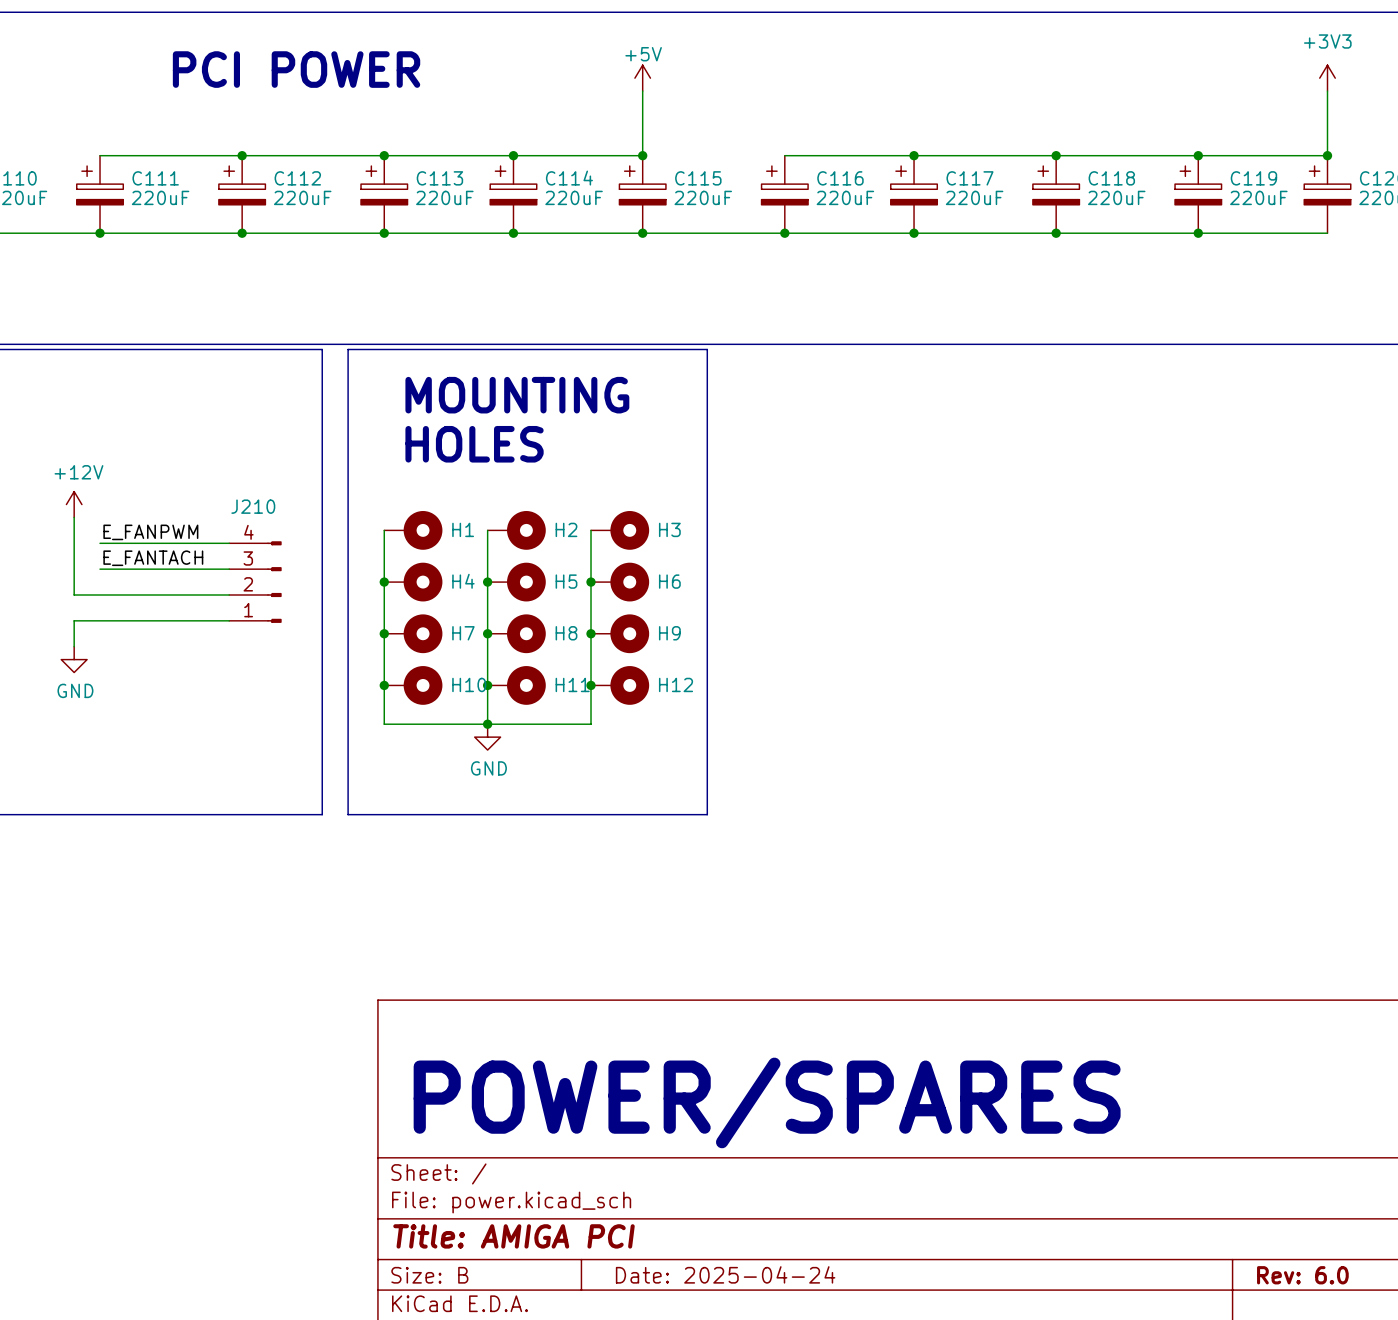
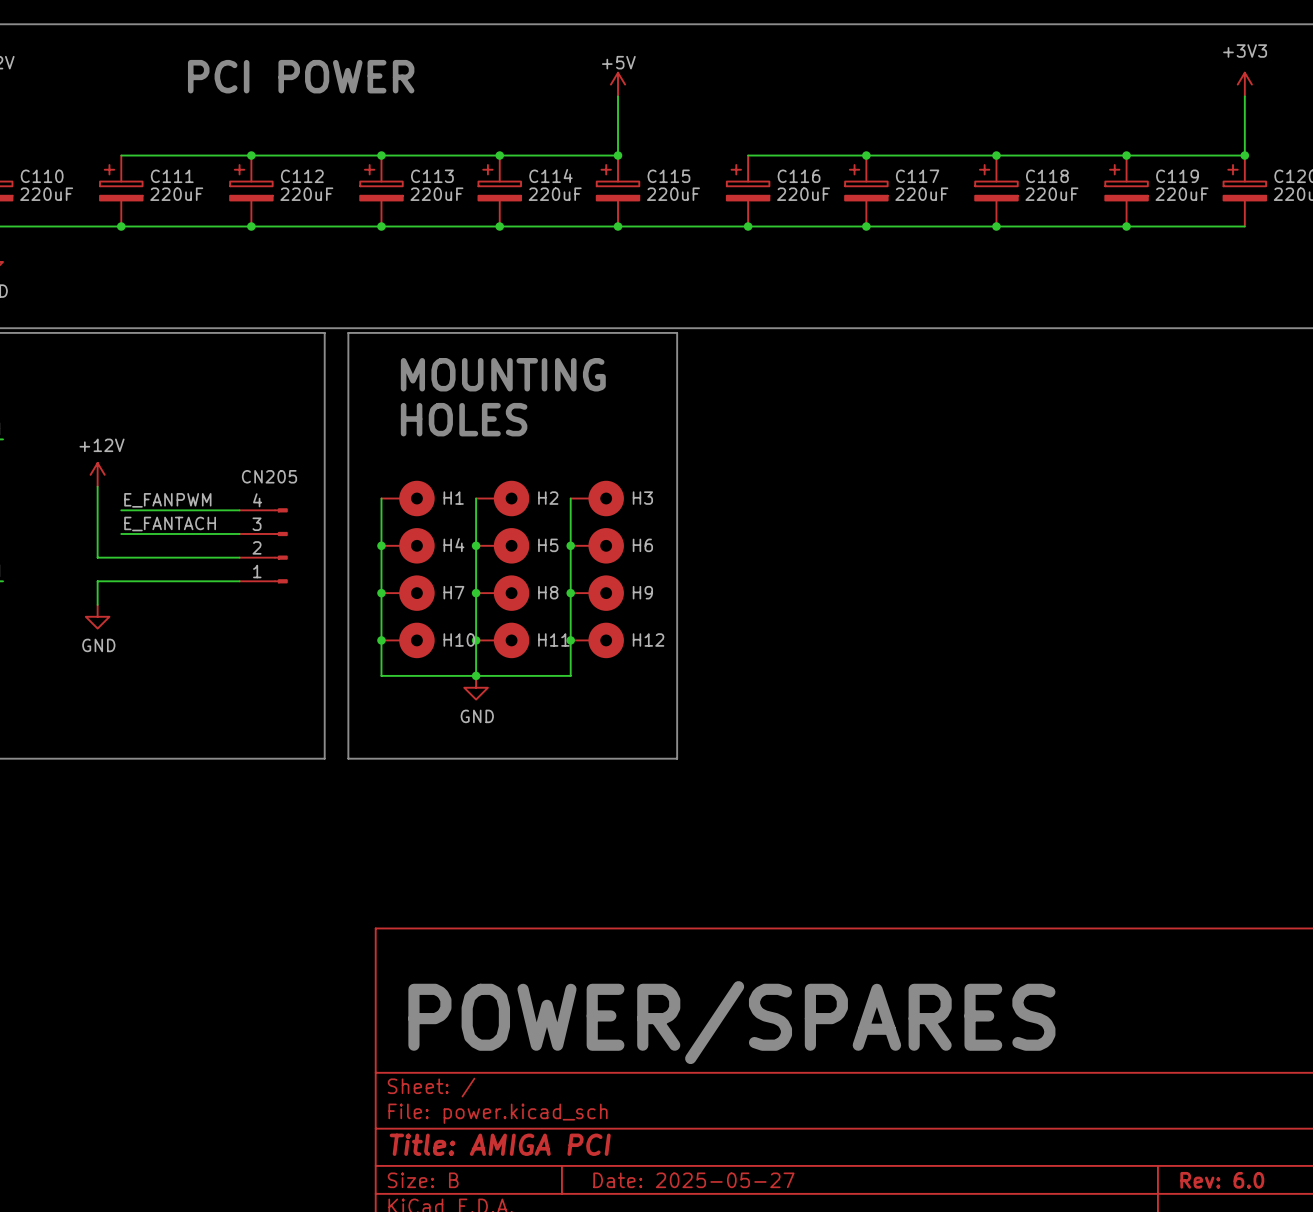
J210 name: J210 (253, 506) -> CN205 (269, 476)
title block: Date: 2025-04-24 (725, 1274) -> Date: 2025-05-27 (693, 1180)

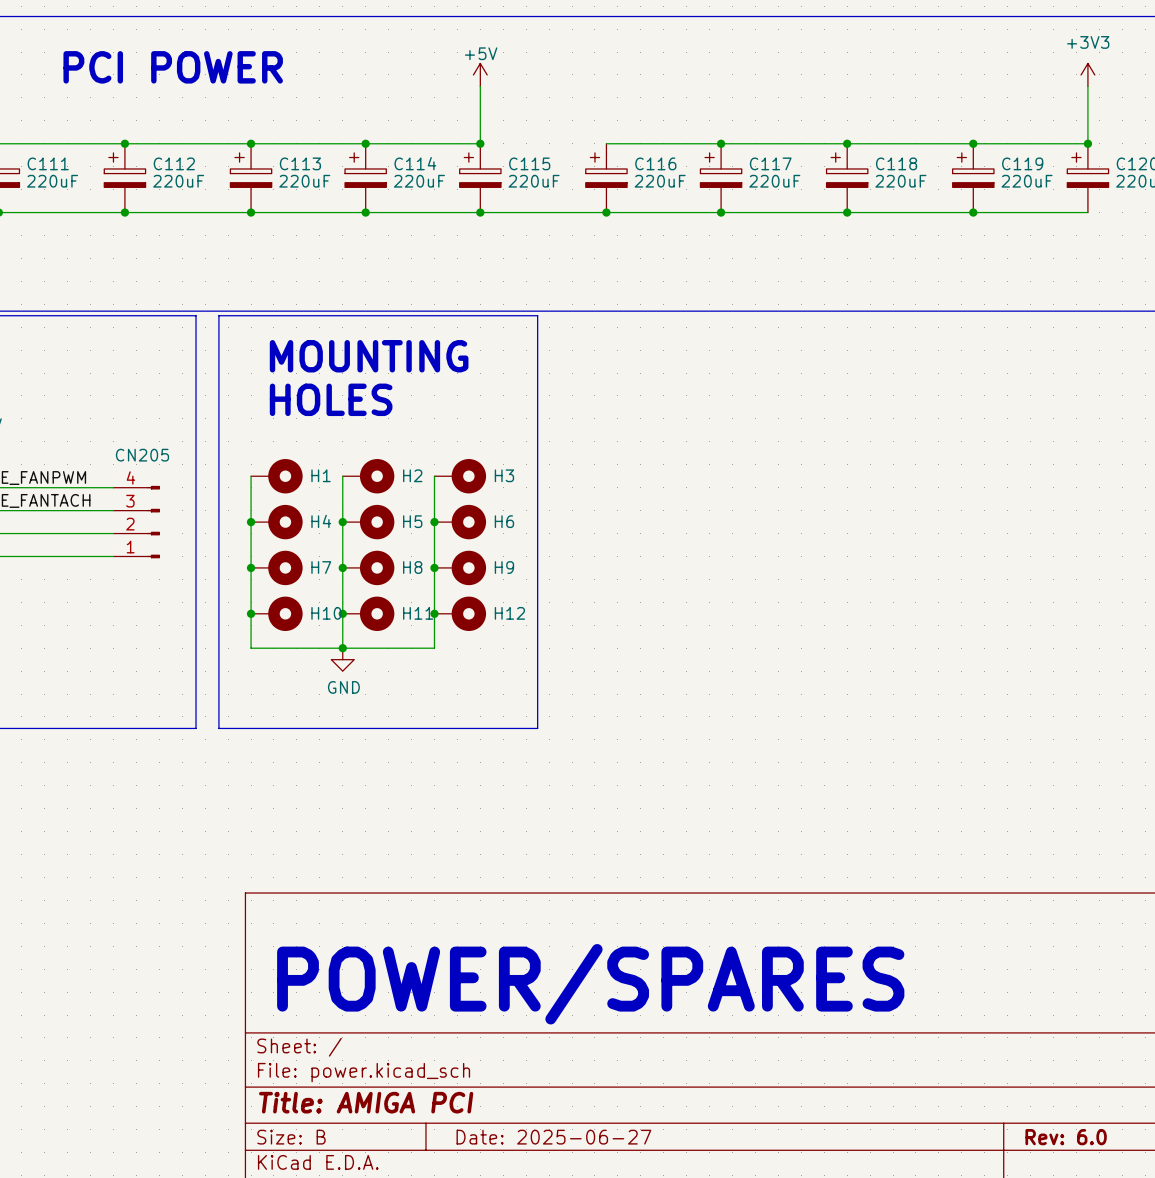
title block: Date: 2025-05-27 (693, 1180) -> Date: 2025-06-27 (553, 1137)

